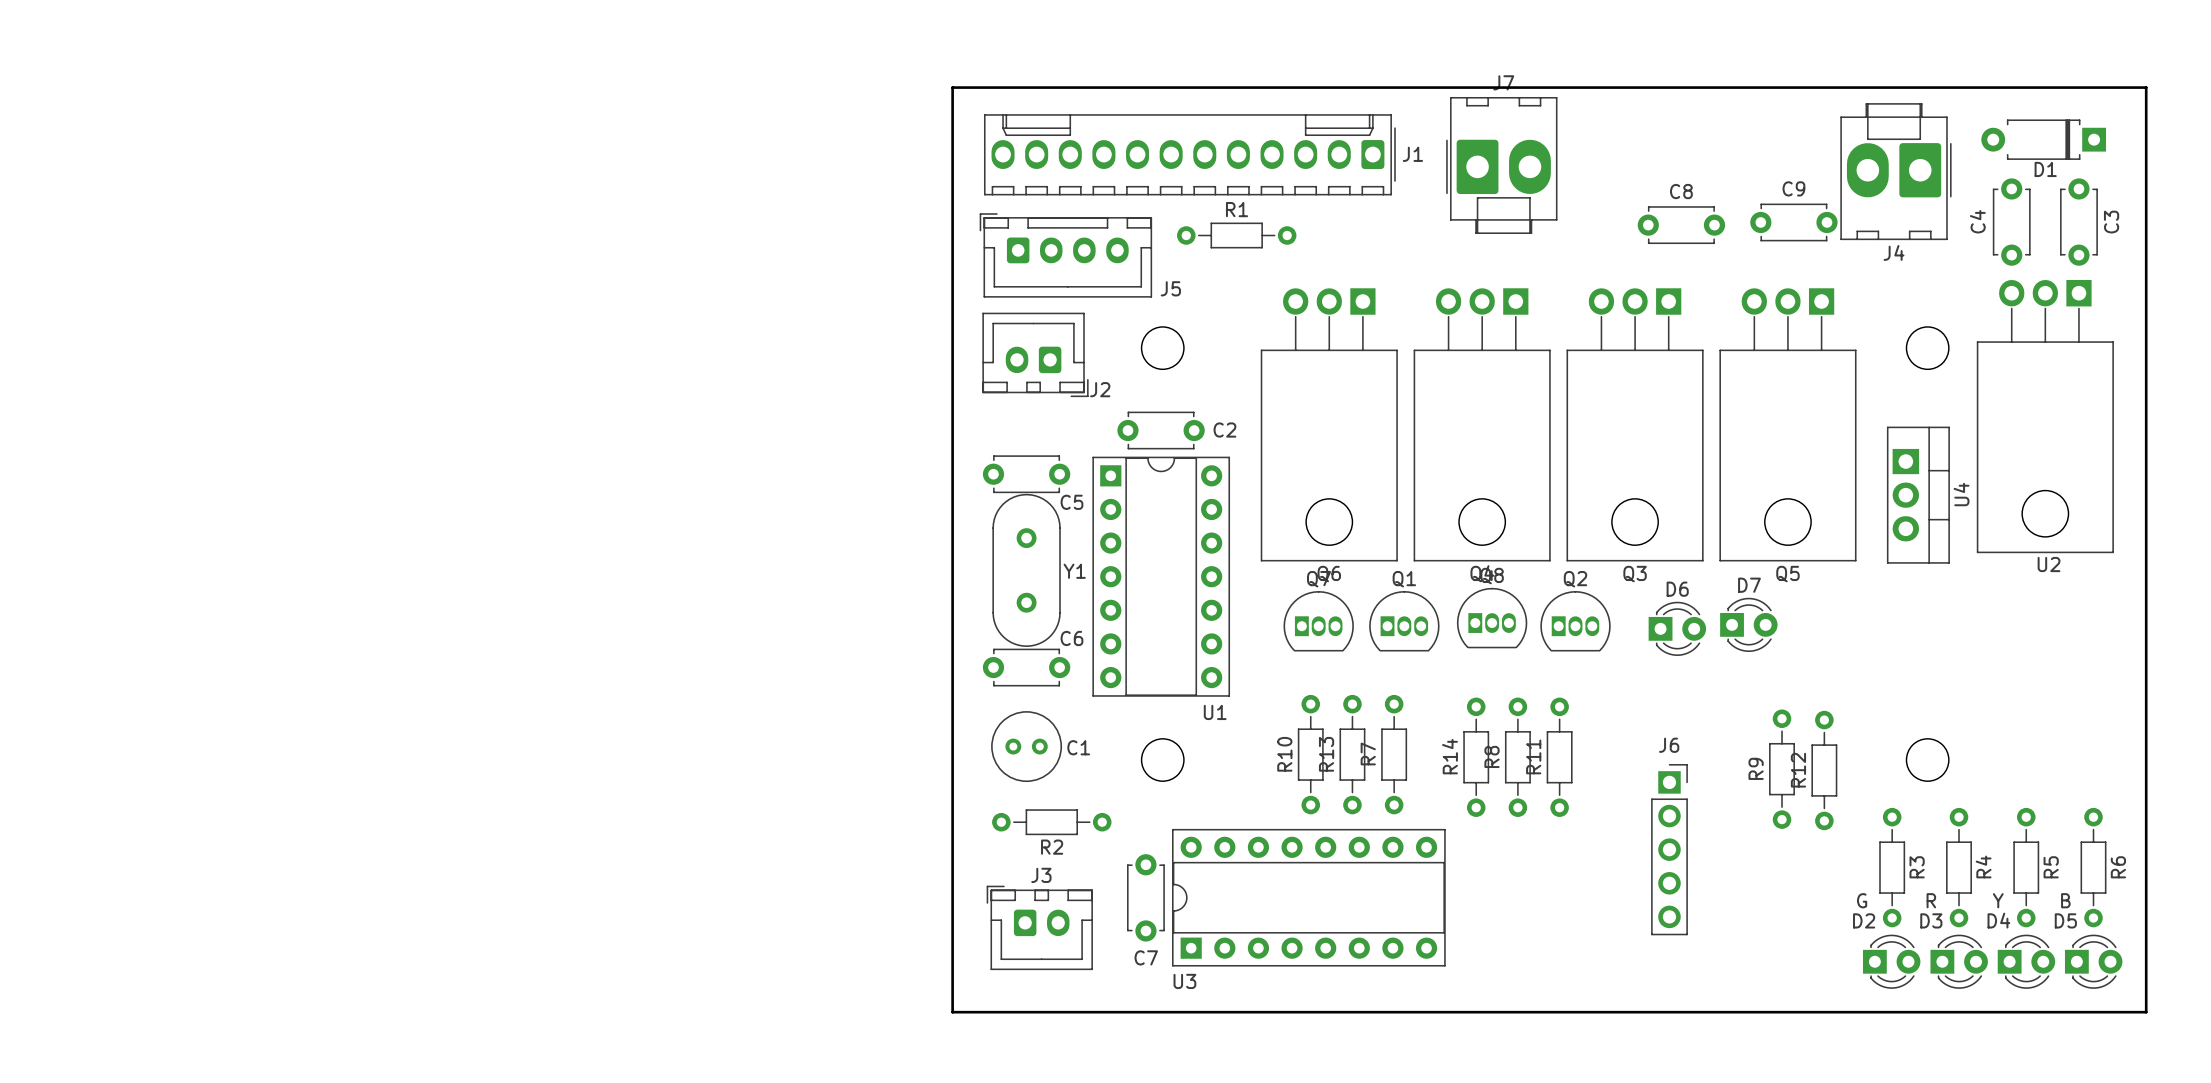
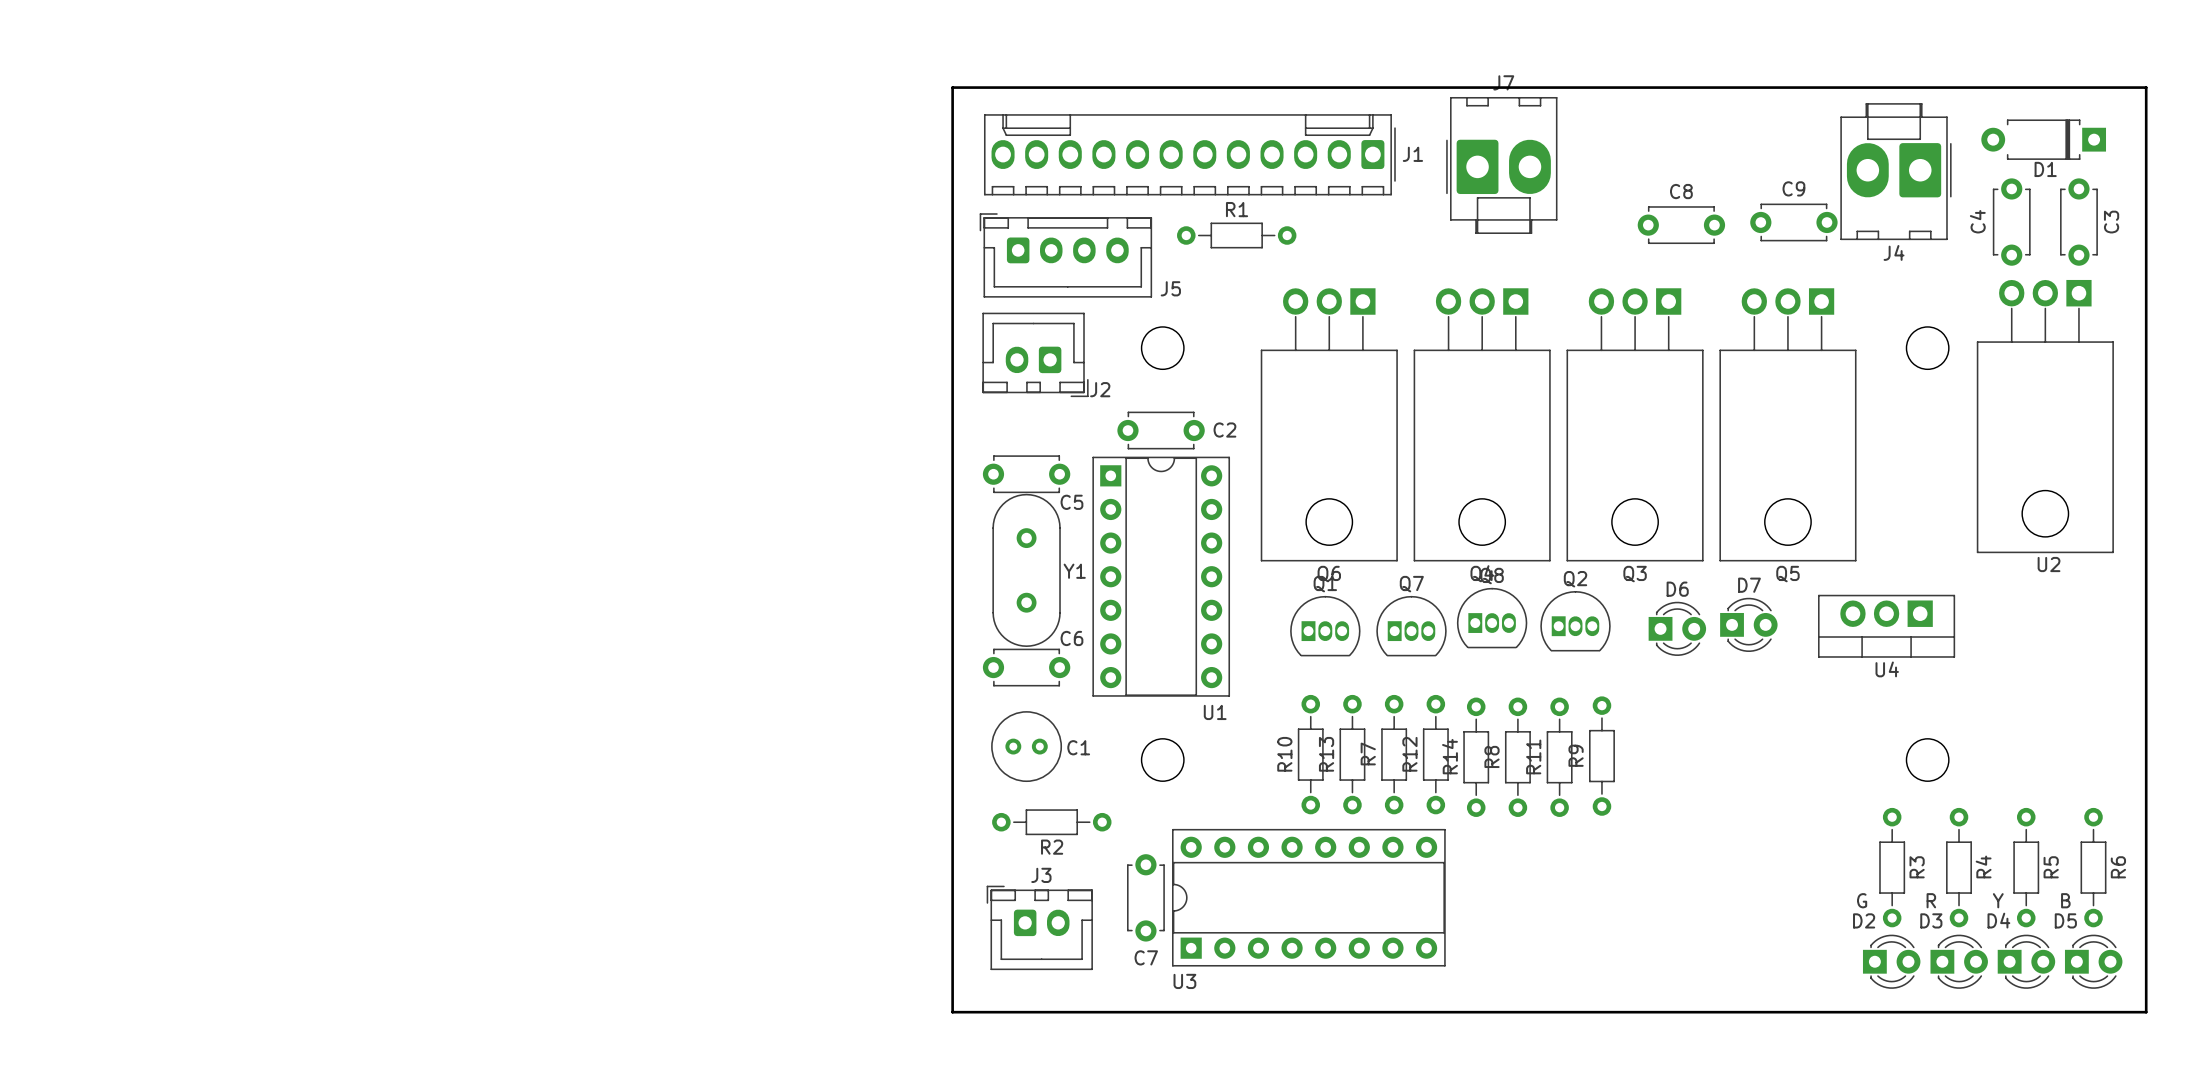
U4 rotation: 0° (1918, 495) -> 90° clockwise (1886, 626)
U4 position: (1918, 495) -> (1886, 626)
Q7 position: (1318, 621) -> (1411, 626)
Q1 position: (1404, 621) -> (1325, 626)
R9 position: (1782, 769) -> (1601, 756)
R12 position: (1824, 770) -> (1435, 754)
J6: (1669, 849) -> none

